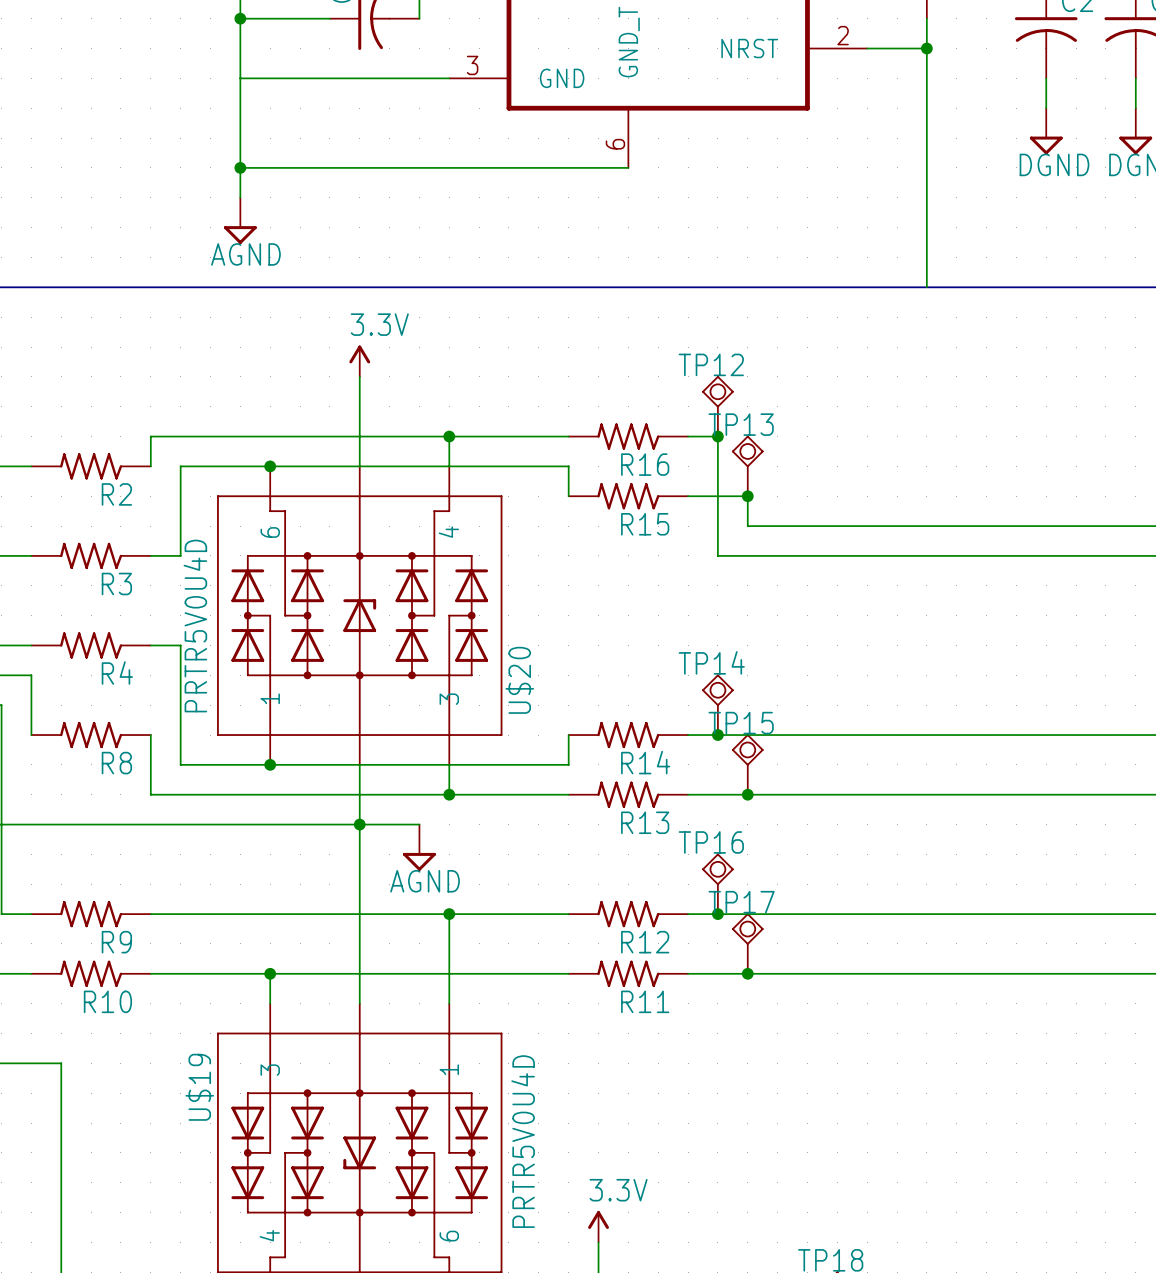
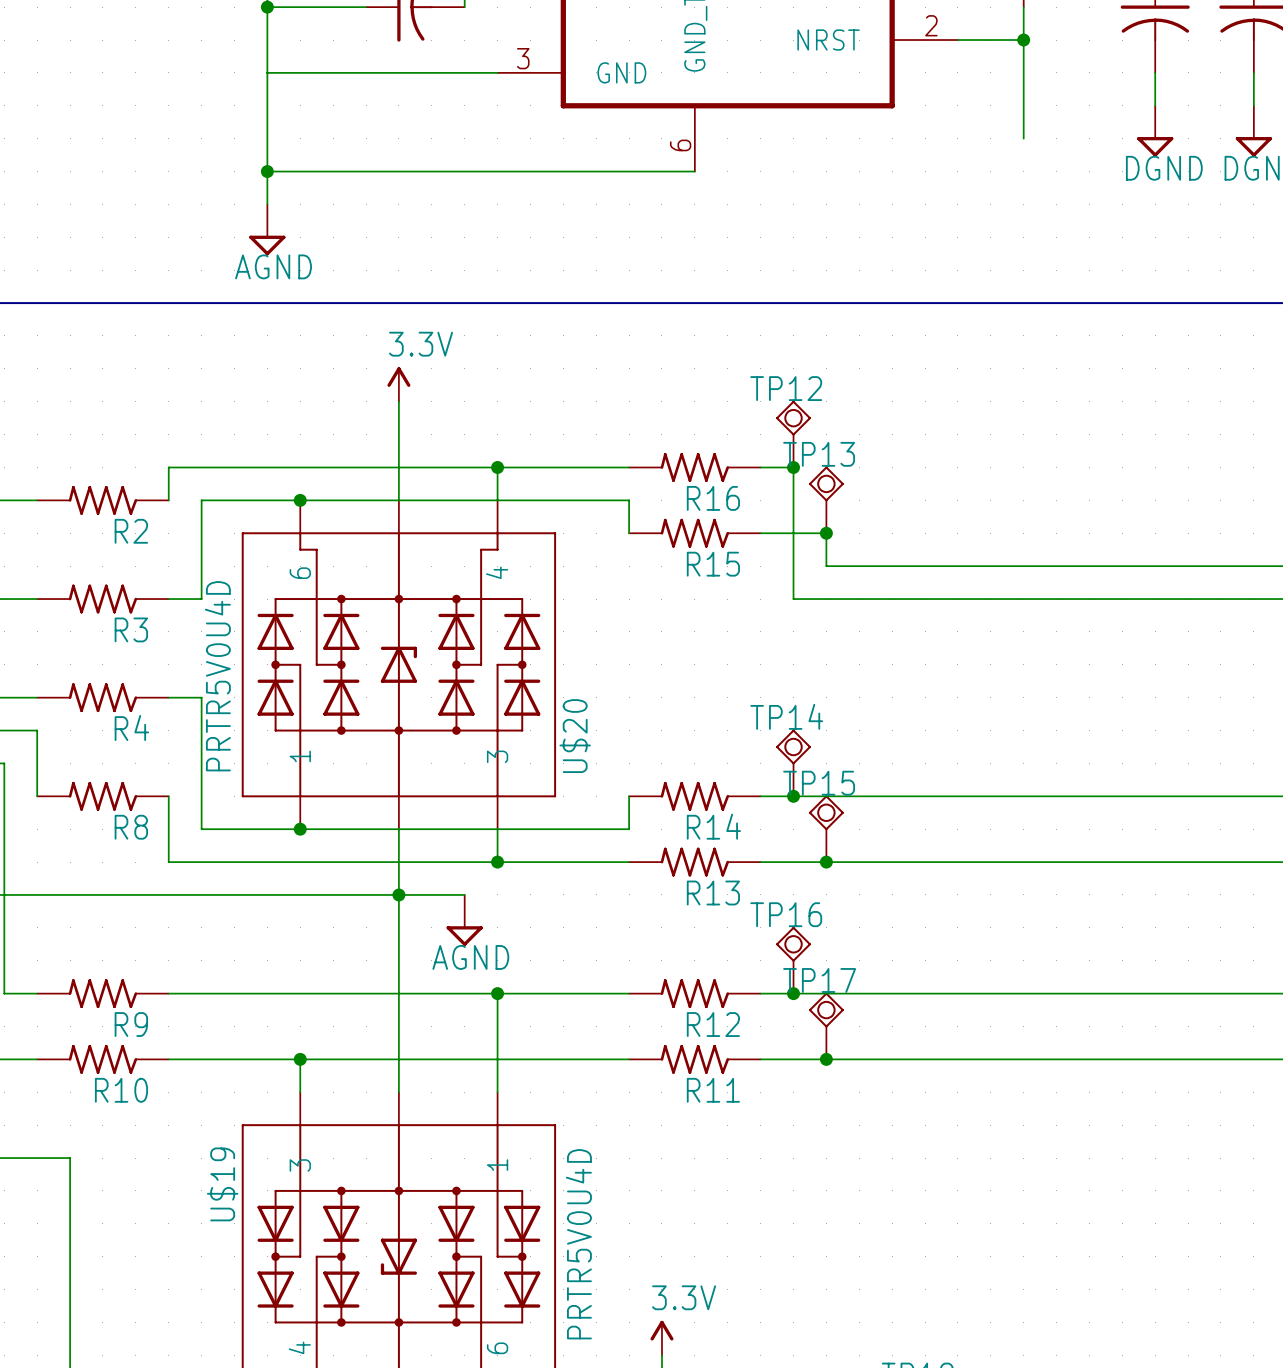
wire: (926, 138) (926, 287) -> none

